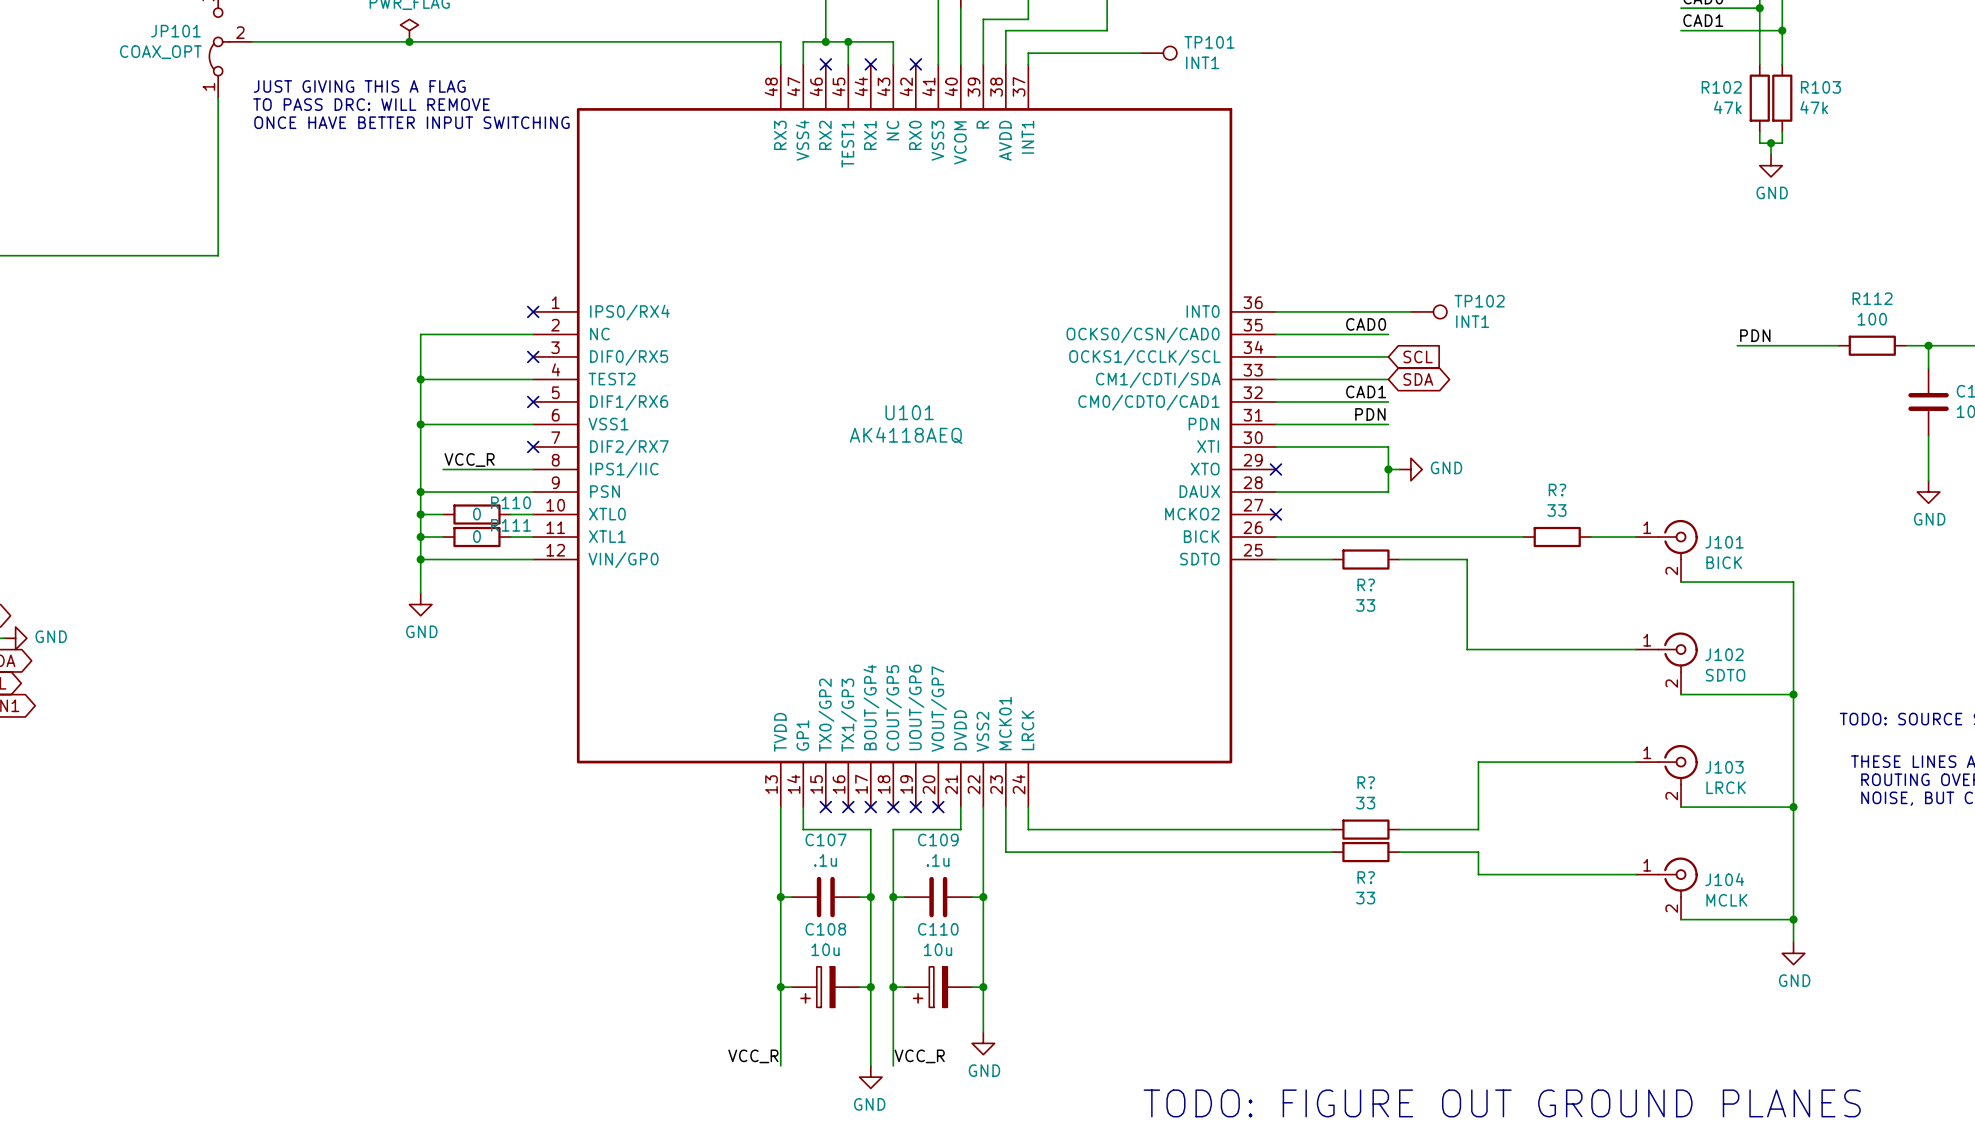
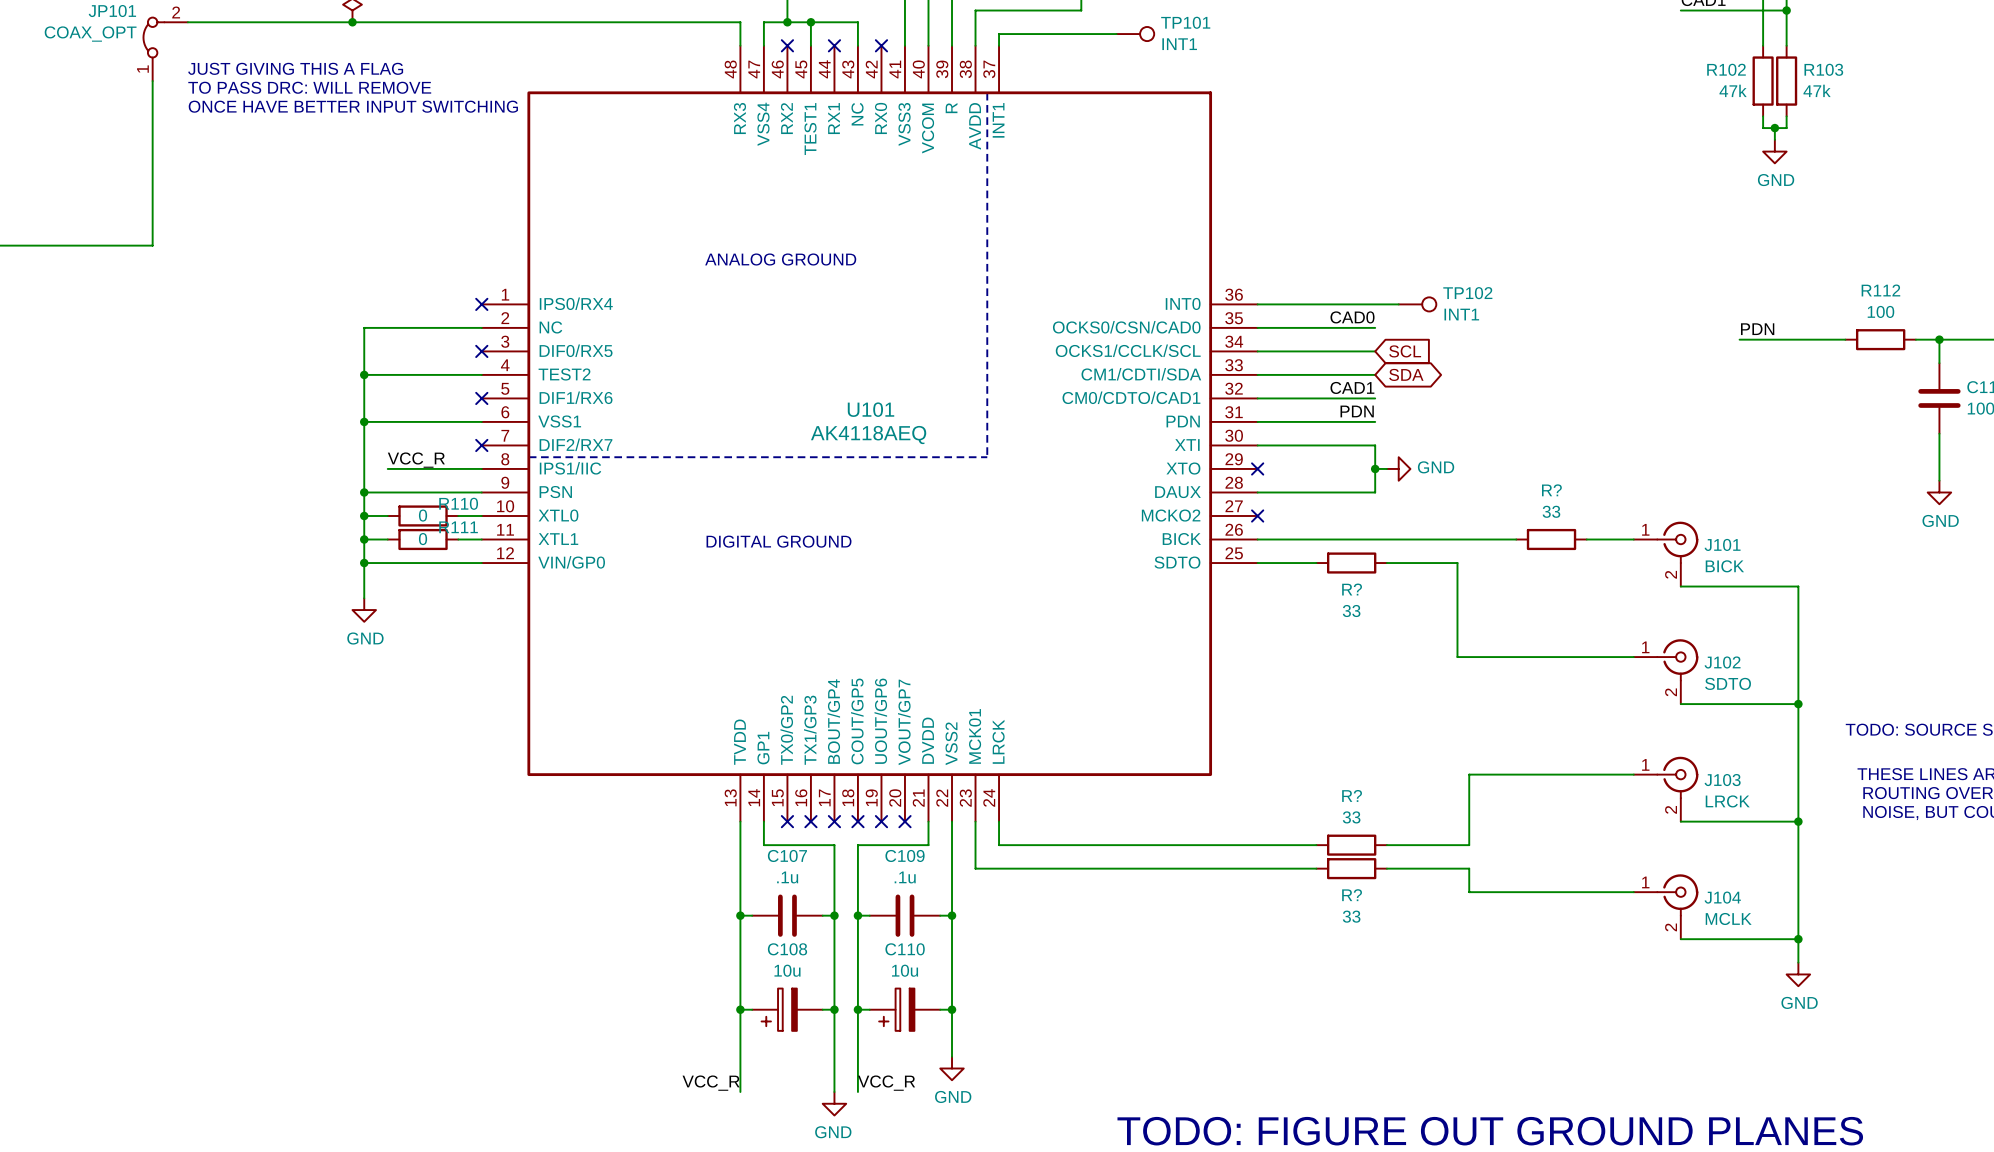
line: none -> (987, 92) (987, 457) (528, 457)
text: none -> ANALOG GROUND (780, 259)
text: none -> DIGITAL GROUND (779, 541)

